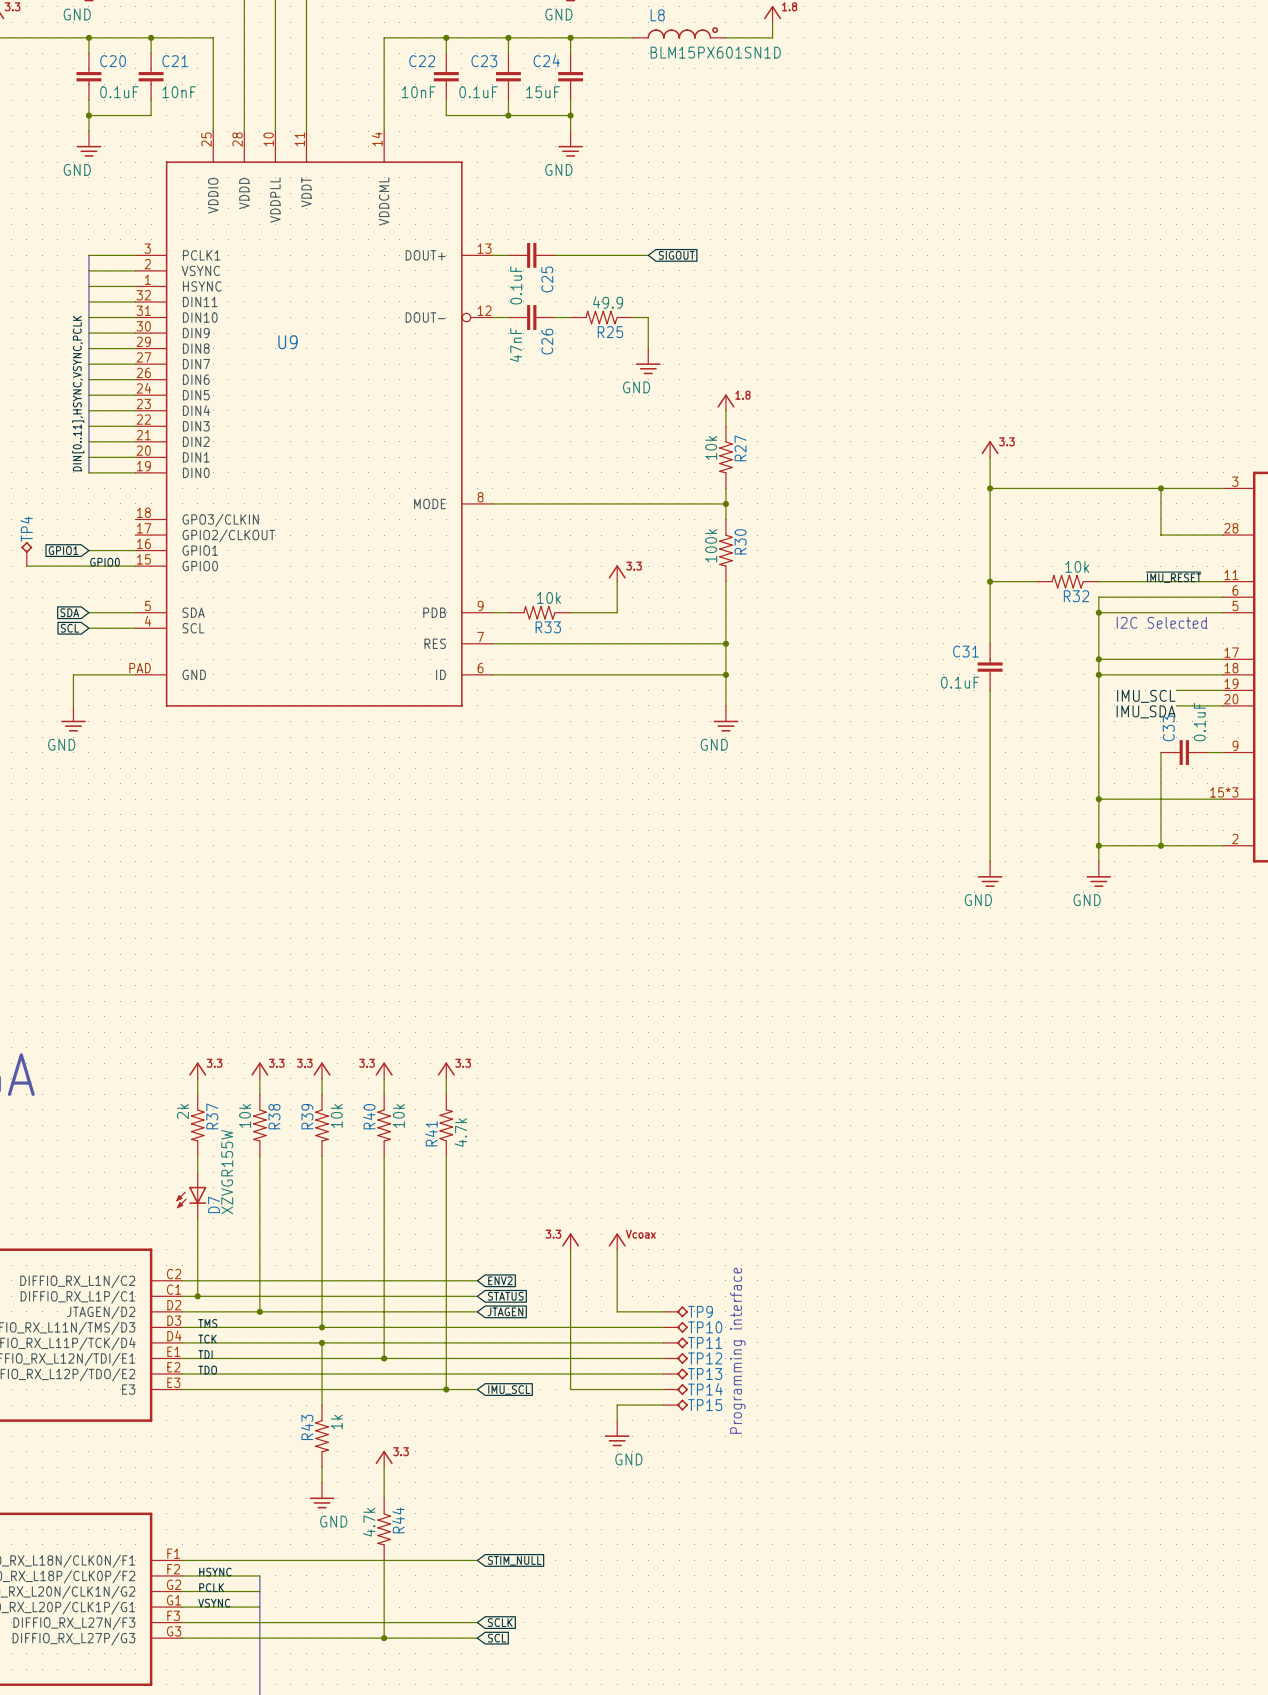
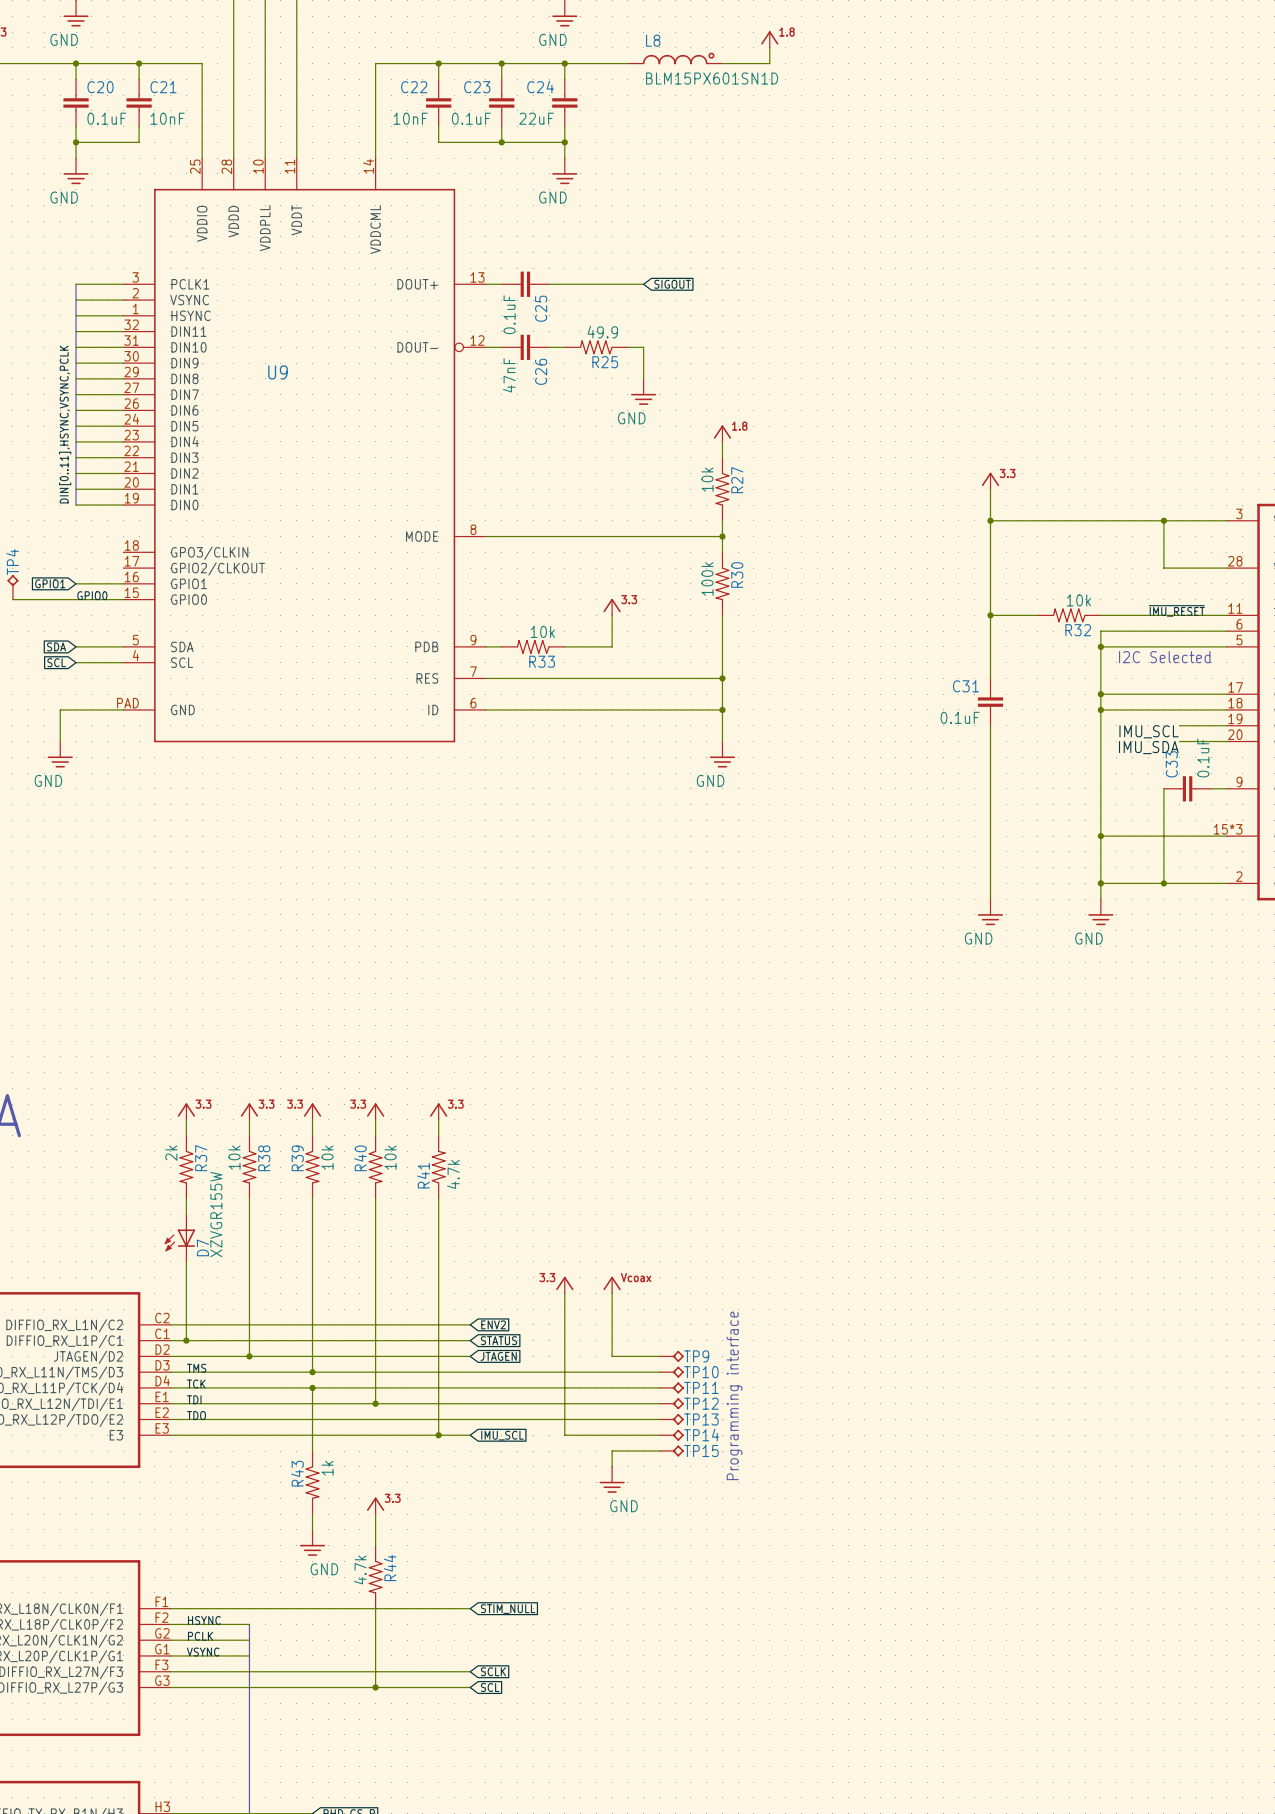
C24 value: 15uF (542, 92) -> 22uF (536, 118)

